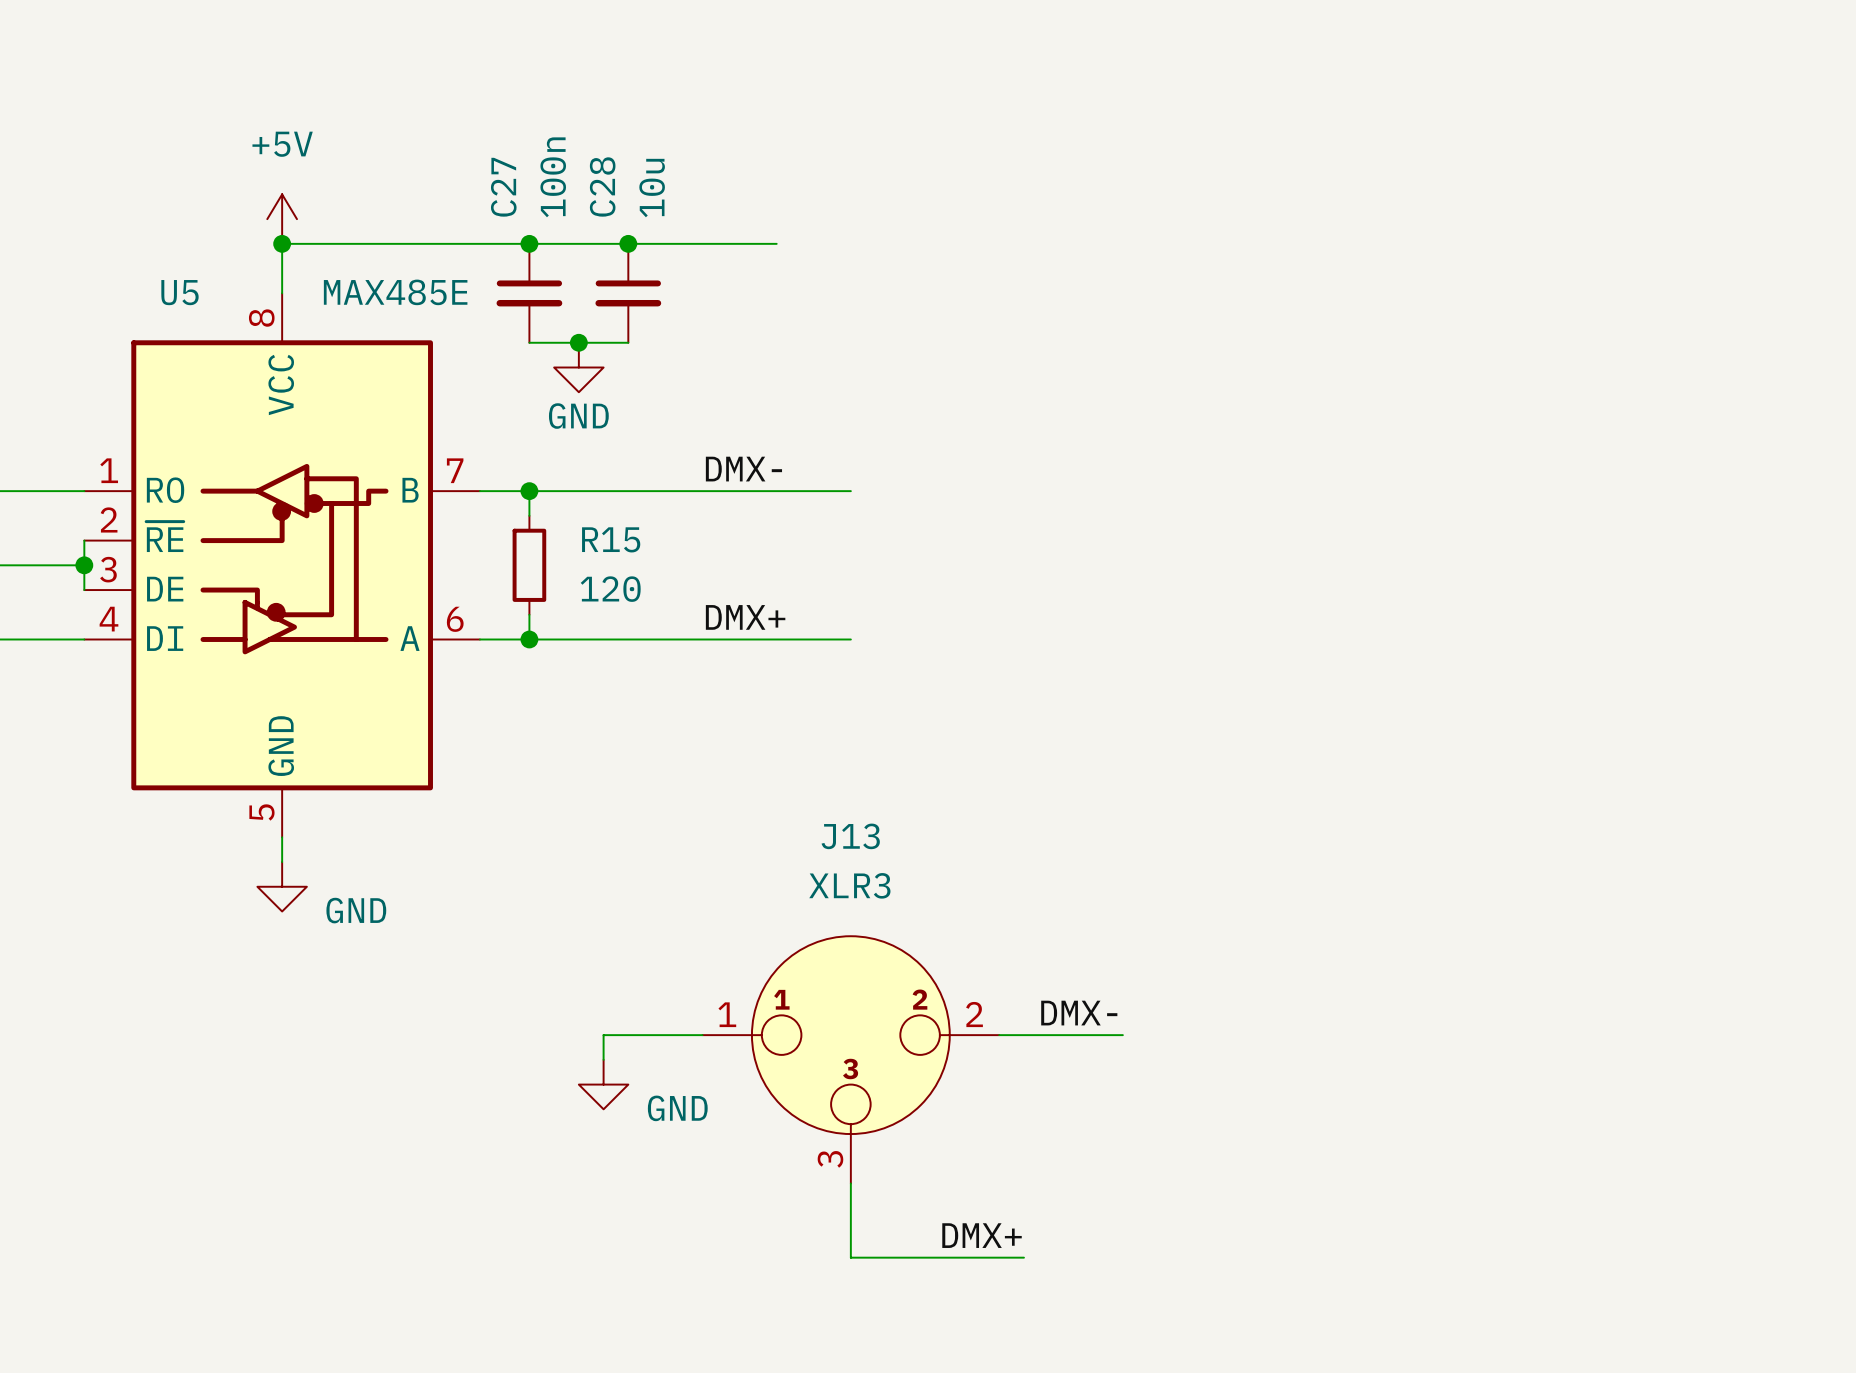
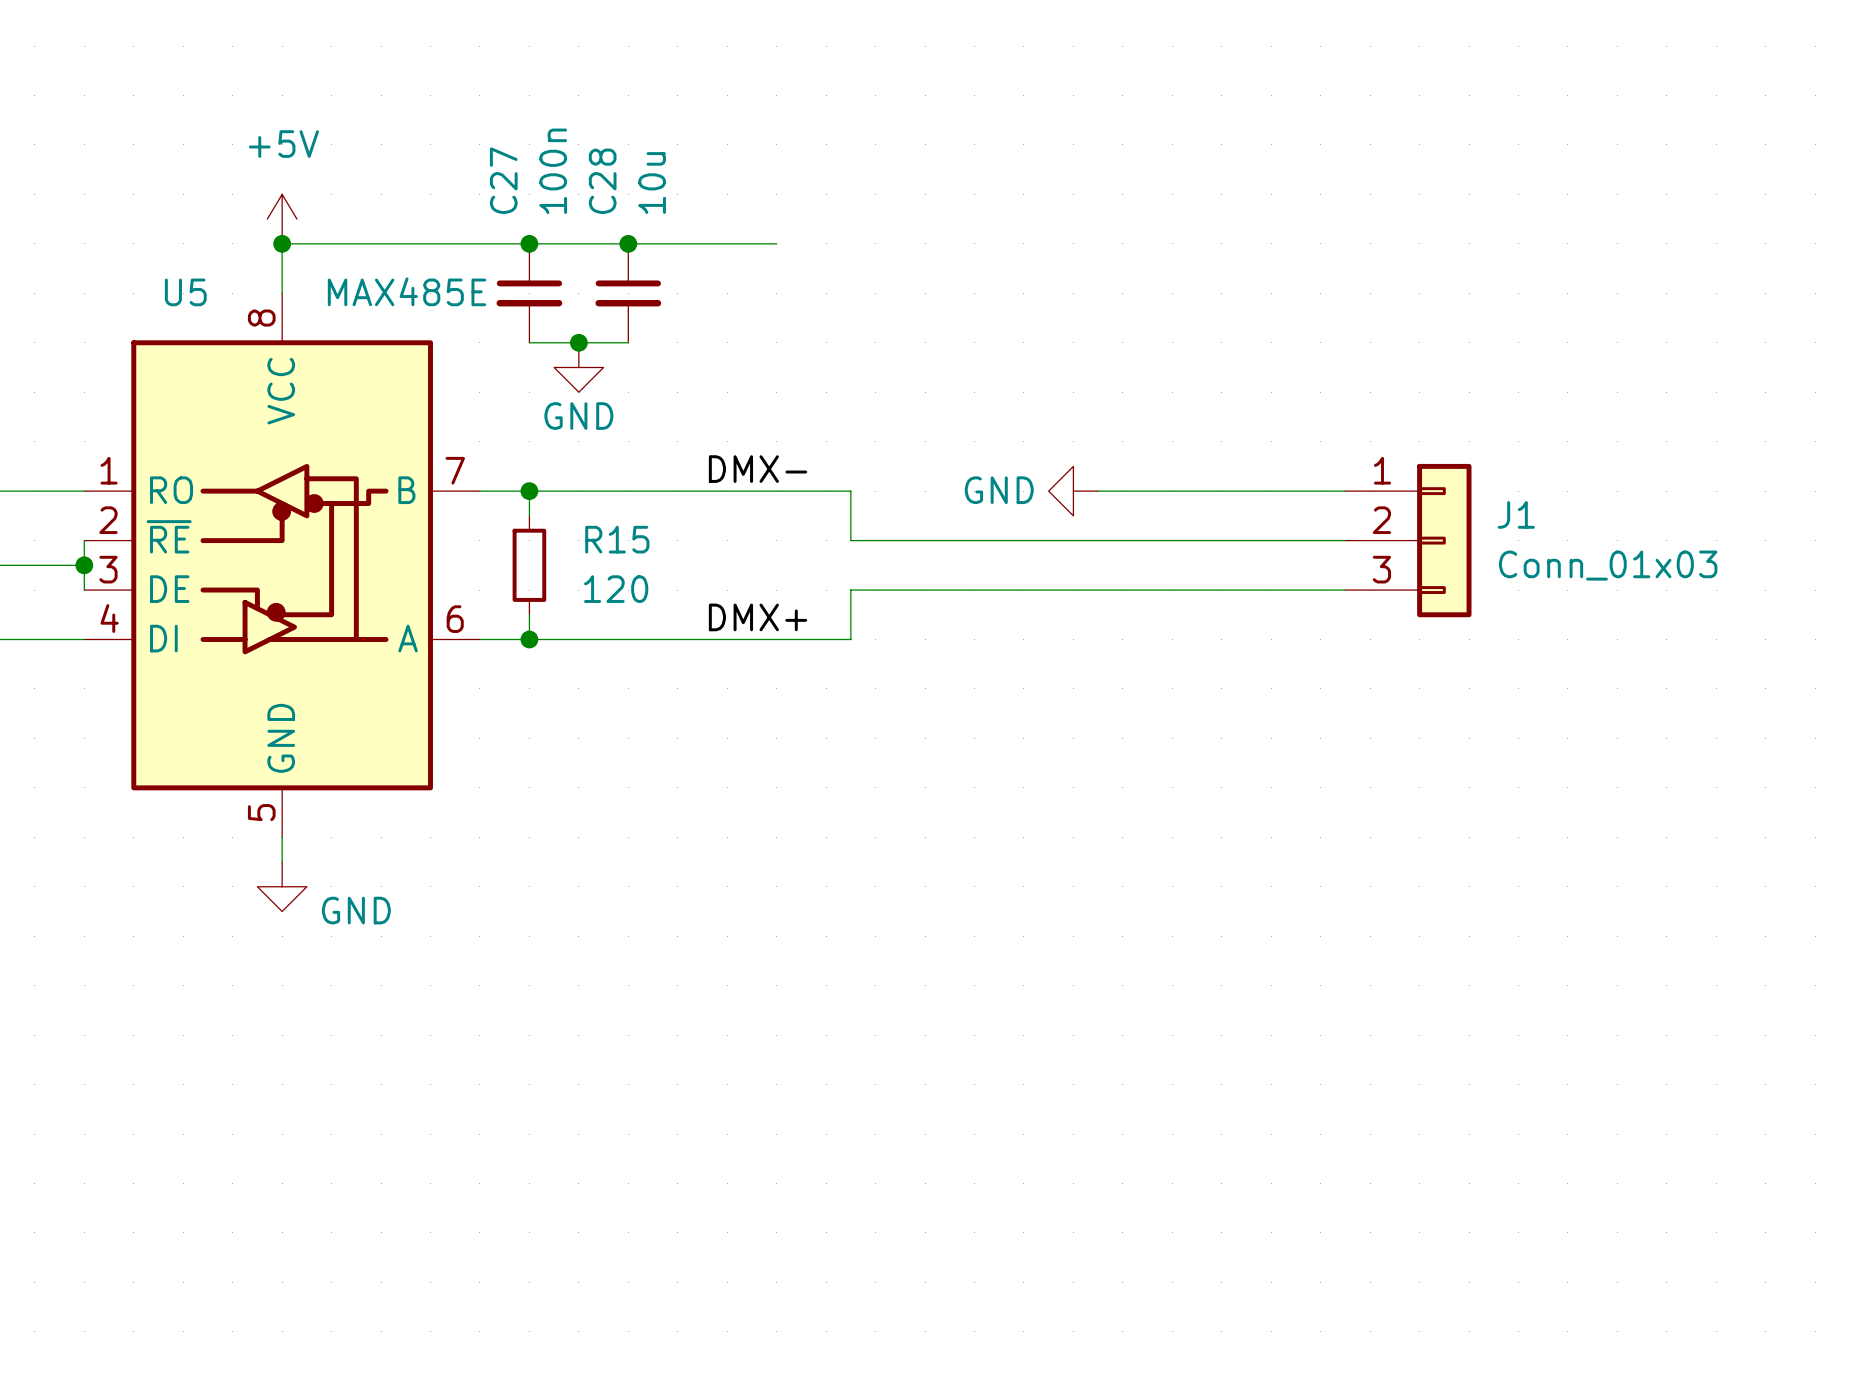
wire: none -> (850, 491) (850, 540) (1345, 540)
power symbol: none -> GND (1073, 491)
wire: none -> (1098, 491) (1345, 491)
J1: none -> Conn_01x03 (1408, 540)
wire: none -> (1345, 590) (850, 590) (850, 639)
label: DMX- (1079, 1013) -> none
wire: (702, 1035) (603, 1035) (603, 1059) -> none
wire: (999, 1035) (1122, 1035) -> none
J13: XLR3 (850, 1059) -> none
power symbol: GND (603, 1084) -> none
wire: (850, 1183) (850, 1257) (1023, 1257) -> none
label: DMX+ (982, 1235) -> none

